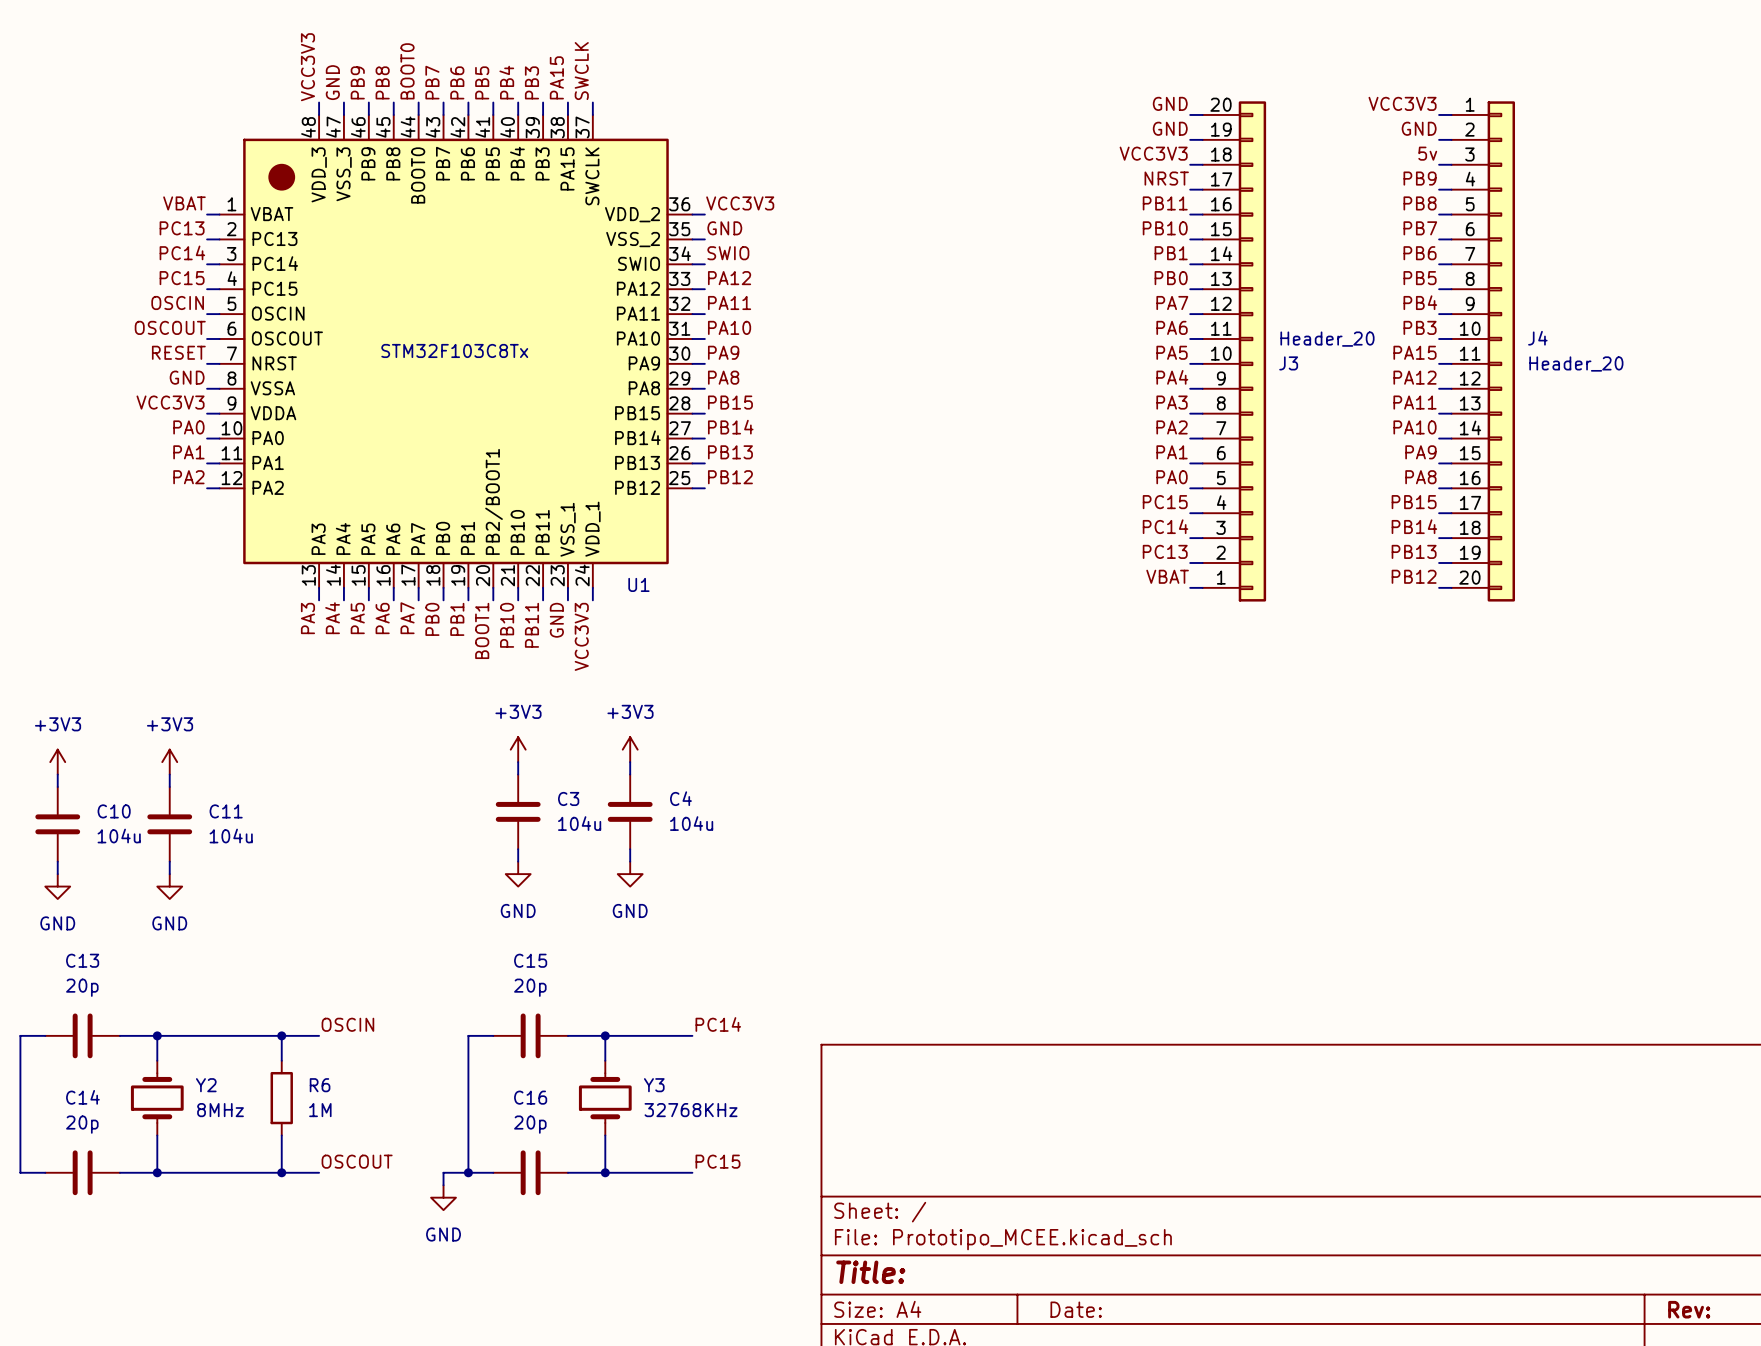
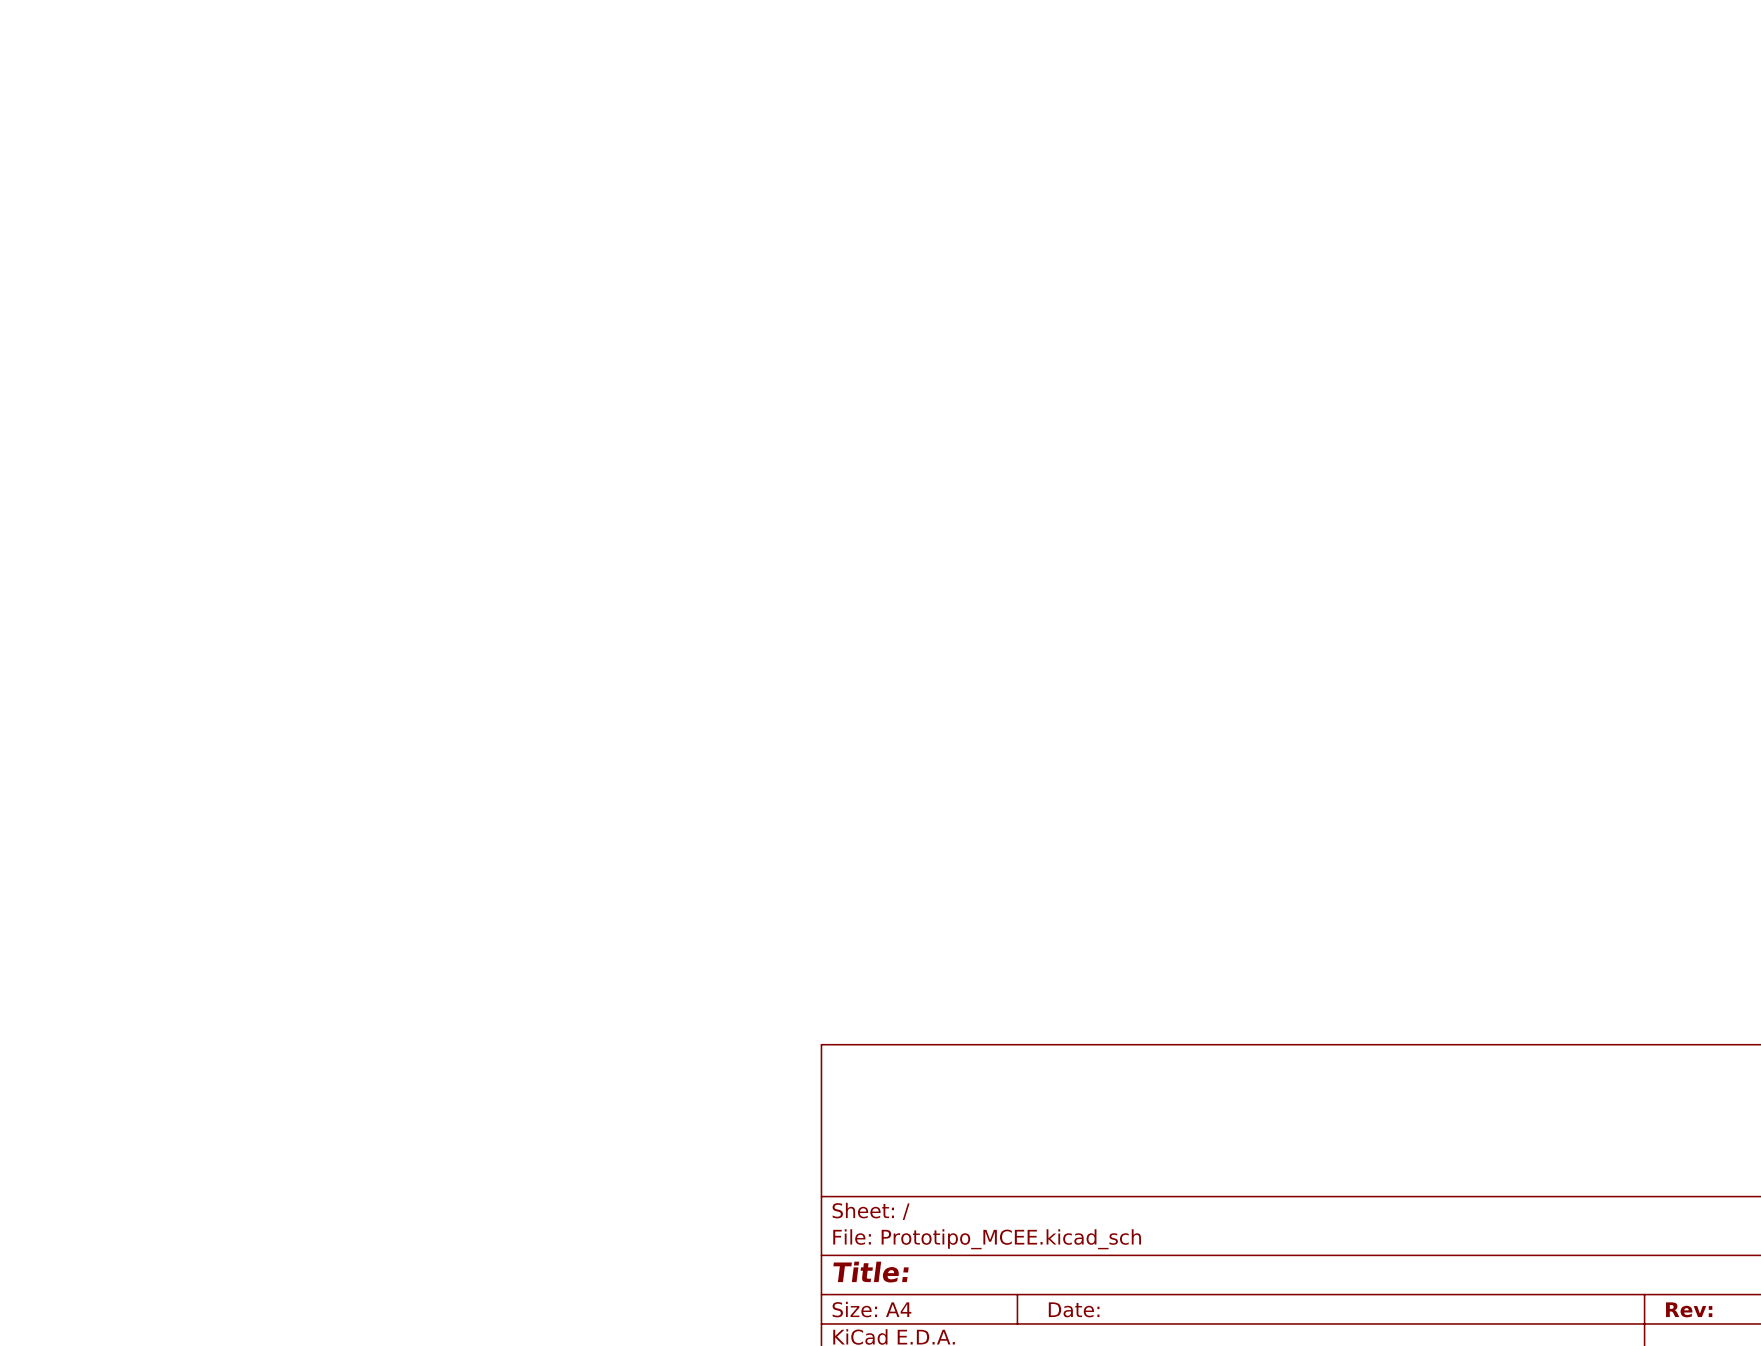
label: VCC3V3 (307, 67) -> none
label: BOOT0 (407, 71) -> none
label: SWCLK (581, 71) -> none
label: PA15 (556, 77) -> none
label: GND (332, 82) -> none
label: PB9 (357, 82) -> none
label: PB8 (382, 82) -> none
label: PB7 (432, 82) -> none
label: PB6 (457, 82) -> none
label: PB5 (482, 82) -> none
label: PB4 (506, 82) -> none
label: PB3 (531, 82) -> none
wire: (319, 102) (319, 114) -> none
wire: (343, 102) (343, 114) -> none
wire: (368, 102) (368, 114) -> none
wire: (393, 102) (393, 114) -> none
wire: (418, 102) (418, 114) -> none
wire: (443, 102) (443, 114) -> none
wire: (468, 102) (468, 114) -> none
wire: (493, 102) (493, 114) -> none
wire: (518, 102) (518, 114) -> none
wire: (543, 102) (543, 114) -> none
wire: (567, 102) (567, 114) -> none
wire: (592, 102) (592, 114) -> none
label: GND (1170, 103) -> none
label: VCC3V3 (1402, 103) -> none
wire: (1190, 114) (1202, 114) -> none
wire: (1439, 114) (1451, 114) -> none
label: GND (1170, 128) -> none
label: GND (1419, 128) -> none
wire: (1190, 139) (1202, 139) -> none
wire: (1439, 139) (1451, 139) -> none
label: VCC3V3 (1153, 153) -> none
label: 5v (1427, 153) -> none
wire: (1190, 164) (1202, 164) -> none
wire: (1439, 164) (1451, 164) -> none
label: NRST (1166, 178) -> none
label: PB9 (1420, 178) -> none
wire: (1190, 189) (1202, 189) -> none
wire: (1439, 189) (1451, 189) -> none
label: VBAT (184, 203) -> none
label: VCC3V3 (740, 203) -> none
label: PB11 (1165, 203) -> none
label: PB8 (1420, 203) -> none
wire: (207, 214) (219, 214) -> none
wire: (692, 214) (704, 214) -> none
wire: (1190, 214) (1202, 214) -> none
wire: (1439, 214) (1451, 214) -> none
label: PC13 (182, 228) -> none
label: GND (724, 228) -> none
label: PB10 (1165, 228) -> none
label: PB7 (1420, 228) -> none
wire: (207, 239) (219, 239) -> none
wire: (692, 239) (704, 239) -> none
wire: (1190, 239) (1202, 239) -> none
wire: (1439, 239) (1451, 239) -> none
label: PC14 (182, 252) -> none
label: SWIO (728, 253) -> none
label: PB1 (1171, 253) -> none
label: PB6 (1420, 253) -> none
wire: (207, 264) (219, 264) -> none
wire: (692, 264) (704, 264) -> none
wire: (1190, 264) (1202, 264) -> none
wire: (1439, 264) (1451, 264) -> none
label: PC15 (182, 278) -> none
label: PA12 (729, 278) -> none
label: PB0 (1171, 278) -> none
label: PB5 (1420, 278) -> none
wire: (207, 289) (219, 289) -> none
wire: (692, 289) (704, 289) -> none
wire: (1190, 289) (1202, 289) -> none
wire: (1439, 289) (1451, 289) -> none
label: OSCIN (177, 302) -> none
label: PA11 (729, 302) -> none
label: PA7 (1172, 302) -> none
label: PB4 (1420, 302) -> none
wire: (207, 314) (219, 314) -> none
wire: (692, 314) (704, 314) -> none
wire: (1190, 314) (1202, 314) -> none
wire: (1439, 314) (1451, 314) -> none
label: OSCOUT (170, 327) -> none
label: PA10 (729, 327) -> none
label: PA6 (1172, 327) -> none
label: PB3 (1420, 327) -> none
wire: (207, 338) (219, 338) -> none
wire: (692, 338) (704, 338) -> none
wire: (1190, 338) (1202, 338) -> none
wire: (1439, 338) (1451, 338) -> none
U1: STM32F103C8Tx (455, 351) -> none
J3: Header_20 (1234, 351) -> none
J4: Header_20 (1483, 351) -> none
label: RESET (178, 352) -> none
label: PA9 (723, 352) -> none
label: PA5 (1172, 352) -> none
label: PA15 (1415, 352) -> none
wire: (207, 363) (219, 363) -> none
wire: (692, 363) (704, 363) -> none
wire: (1190, 363) (1202, 363) -> none
wire: (1439, 363) (1451, 363) -> none
label: GND (187, 377) -> none
label: PA8 (723, 377) -> none
label: PA4 (1172, 377) -> none
label: PA12 (1415, 377) -> none
wire: (207, 388) (219, 388) -> none
wire: (692, 388) (704, 388) -> none
wire: (1190, 388) (1202, 388) -> none
wire: (1439, 388) (1451, 388) -> none
label: VCC3V3 (170, 402) -> none
label: PB15 (730, 402) -> none
label: PA3 (1172, 402) -> none
label: PA11 (1415, 402) -> none
wire: (207, 413) (219, 413) -> none
wire: (692, 413) (704, 413) -> none
wire: (1190, 413) (1202, 413) -> none
wire: (1439, 413) (1451, 413) -> none
label: PA0 (188, 427) -> none
label: PB14 (730, 427) -> none
label: PA2 (1172, 427) -> none
label: PA10 (1415, 427) -> none
wire: (207, 438) (219, 438) -> none
wire: (692, 438) (704, 438) -> none
wire: (1190, 438) (1202, 438) -> none
wire: (1439, 438) (1451, 438) -> none
label: PA1 (188, 452) -> none
label: PB13 (730, 452) -> none
label: PA1 (1172, 452) -> none
label: PA9 (1420, 452) -> none
wire: (207, 463) (219, 463) -> none
wire: (692, 463) (704, 463) -> none
wire: (1190, 463) (1202, 463) -> none
wire: (1439, 463) (1451, 463) -> none
label: PA2 (188, 477) -> none
label: PB12 (730, 477) -> none
label: PA0 (1172, 477) -> none
label: PA8 (1420, 477) -> none
wire: (207, 488) (219, 488) -> none
wire: (692, 488) (704, 488) -> none
wire: (1190, 488) (1202, 488) -> none
wire: (1439, 488) (1451, 488) -> none
label: PC15 (1165, 502) -> none
label: PB15 (1414, 502) -> none
wire: (1190, 513) (1202, 513) -> none
wire: (1439, 513) (1451, 513) -> none
label: PC14 (1165, 526) -> none
label: PB14 (1414, 526) -> none
wire: (1190, 538) (1202, 538) -> none
wire: (1439, 538) (1451, 538) -> none
label: PC13 (1165, 551) -> none
label: PB13 (1414, 551) -> none
wire: (1190, 562) (1202, 562) -> none
wire: (1439, 562) (1451, 562) -> none
label: VBAT (1167, 576) -> none
label: PB12 (1414, 576) -> none
wire: (319, 587) (319, 600) -> none
wire: (343, 587) (343, 600) -> none
wire: (368, 587) (368, 600) -> none
wire: (393, 587) (393, 600) -> none
wire: (418, 587) (418, 600) -> none
wire: (443, 587) (443, 600) -> none
wire: (468, 587) (468, 600) -> none
wire: (493, 587) (493, 600) -> none
wire: (518, 587) (518, 600) -> none
wire: (543, 587) (543, 600) -> none
wire: (567, 587) (567, 600) -> none
wire: (592, 587) (592, 600) -> none
wire: (1190, 587) (1202, 587) -> none
wire: (1439, 587) (1451, 587) -> none
label: PA3 (307, 618) -> none
label: PA4 (332, 618) -> none
label: PA5 (357, 618) -> none
label: PA6 (382, 618) -> none
label: PA7 (407, 618) -> none
label: PB0 (432, 619) -> none
label: PB1 (457, 619) -> none
label: GND (556, 620) -> none
label: PB10 (507, 625) -> none
label: PB11 (531, 625) -> none
label: BOOT1 (482, 630) -> none
label: VCC3V3 (581, 636) -> none
power symbol: +3V3 (518, 749) -> none
power symbol: +3V3 (630, 749) -> none
power symbol: +3V3 (57, 762) -> none
power symbol: +3V3 (169, 762) -> none
wire: (518, 762) (518, 774) -> none
wire: (630, 762) (630, 774) -> none
wire: (57, 774) (57, 786) -> none
wire: (169, 774) (169, 786) -> none
C3: 104u (518, 811) -> none
C4: 104u (630, 811) -> none
C10: 104u (57, 824) -> none
C11: 104u (169, 824) -> none
wire: (518, 849) (518, 861) -> none
wire: (630, 849) (630, 861) -> none
wire: (57, 861) (57, 874) -> none
wire: (169, 861) (169, 874) -> none
power symbol: GND (518, 874) -> none
power symbol: GND (630, 874) -> none
power symbol: GND (57, 886) -> none
power symbol: GND (169, 886) -> none
label: OSCIN (347, 1024) -> none
label: PC14 (718, 1024) -> none
wire: (45, 1035) (20, 1035) (20, 1172) (45, 1172) -> none
C13: 20p (82, 1035) -> none
wire: (119, 1035) (319, 1035) -> none
wire: (157, 1035) (157, 1060) -> none
junction: (157, 1035) -> none
wire: (281, 1035) (281, 1060) -> none
junction: (281, 1035) -> none
wire: (493, 1035) (468, 1035) (468, 1172) -> none
C15: 20p (530, 1035) -> none
wire: (567, 1035) (692, 1035) -> none
wire: (605, 1035) (605, 1060) -> none
junction: (605, 1035) -> none
Y2: 8MHz (157, 1098) -> none
R6: 1M (281, 1098) -> none
Y3: 32768KHz (605, 1098) -> none
wire: (157, 1135) (157, 1172) -> none
wire: (281, 1135) (281, 1172) -> none
wire: (605, 1135) (605, 1172) -> none
label: OSCOUT (357, 1161) -> none
label: PC15 (717, 1161) -> none
C14: 20p (82, 1172) -> none
wire: (119, 1172) (319, 1172) -> none
junction: (157, 1172) -> none
junction: (281, 1172) -> none
junction: (468, 1172) -> none
wire: (493, 1172) (443, 1172) (443, 1185) -> none
C16: 20p (530, 1172) -> none
wire: (567, 1172) (692, 1172) -> none
junction: (605, 1172) -> none
power symbol: GND (443, 1197) -> none

